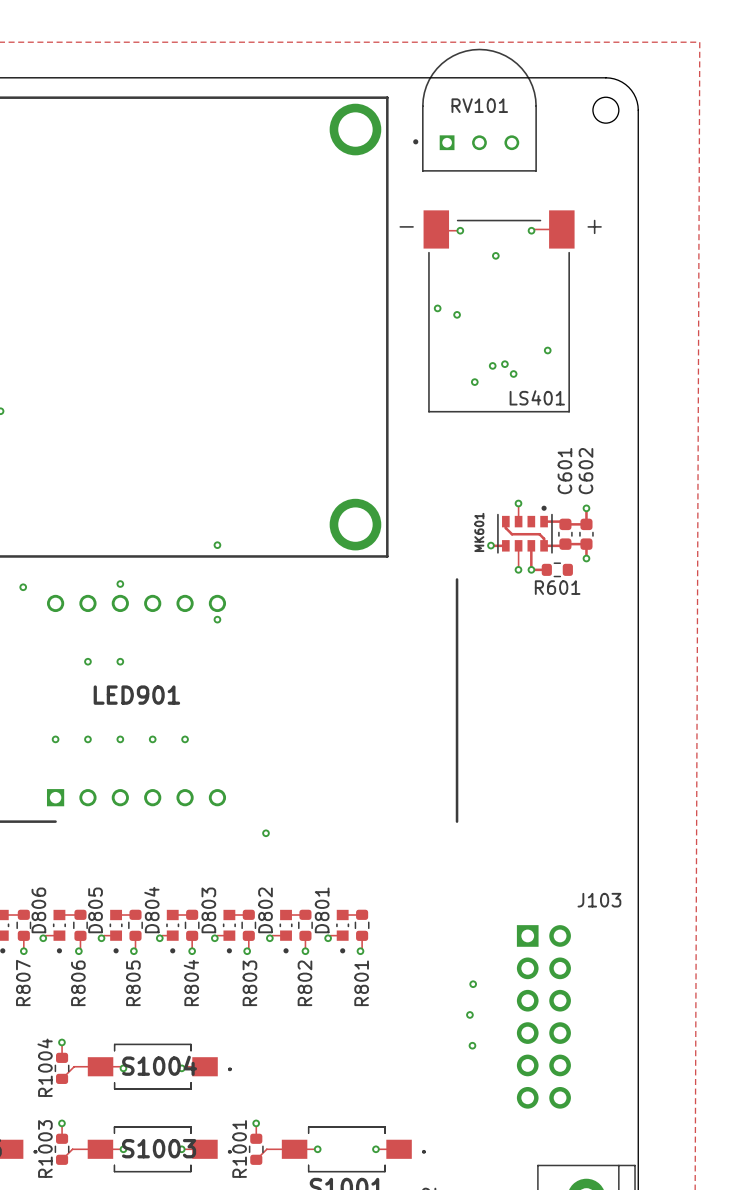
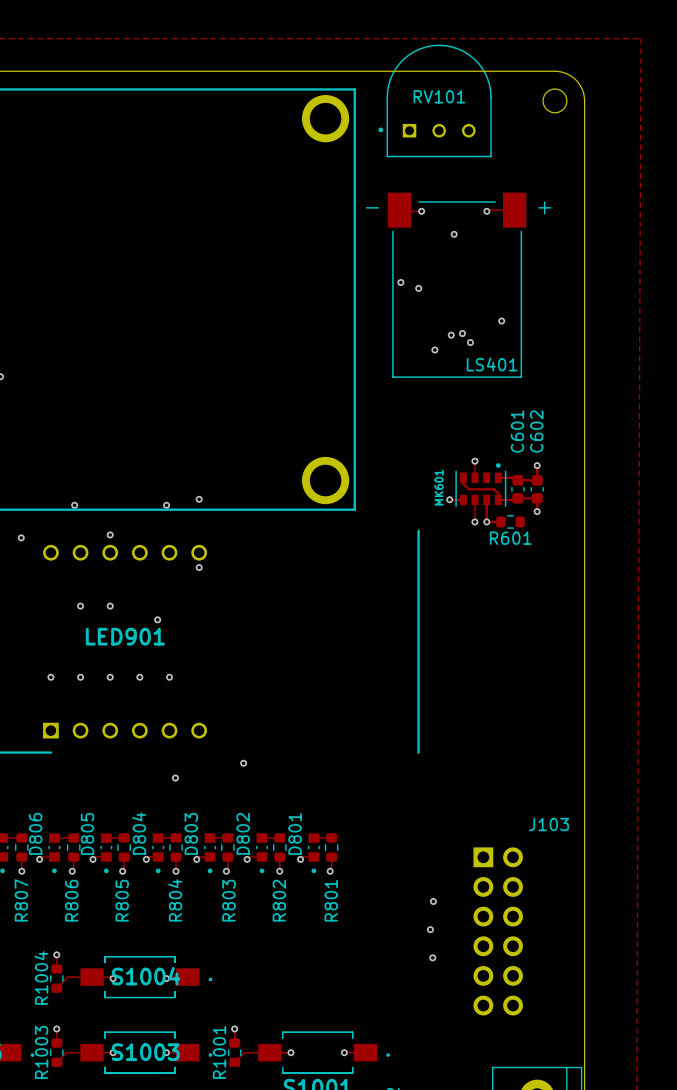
via: none -> (74, 505)
via: none -> (166, 505)
via: none -> (157, 619)
via: none -> (175, 778)

